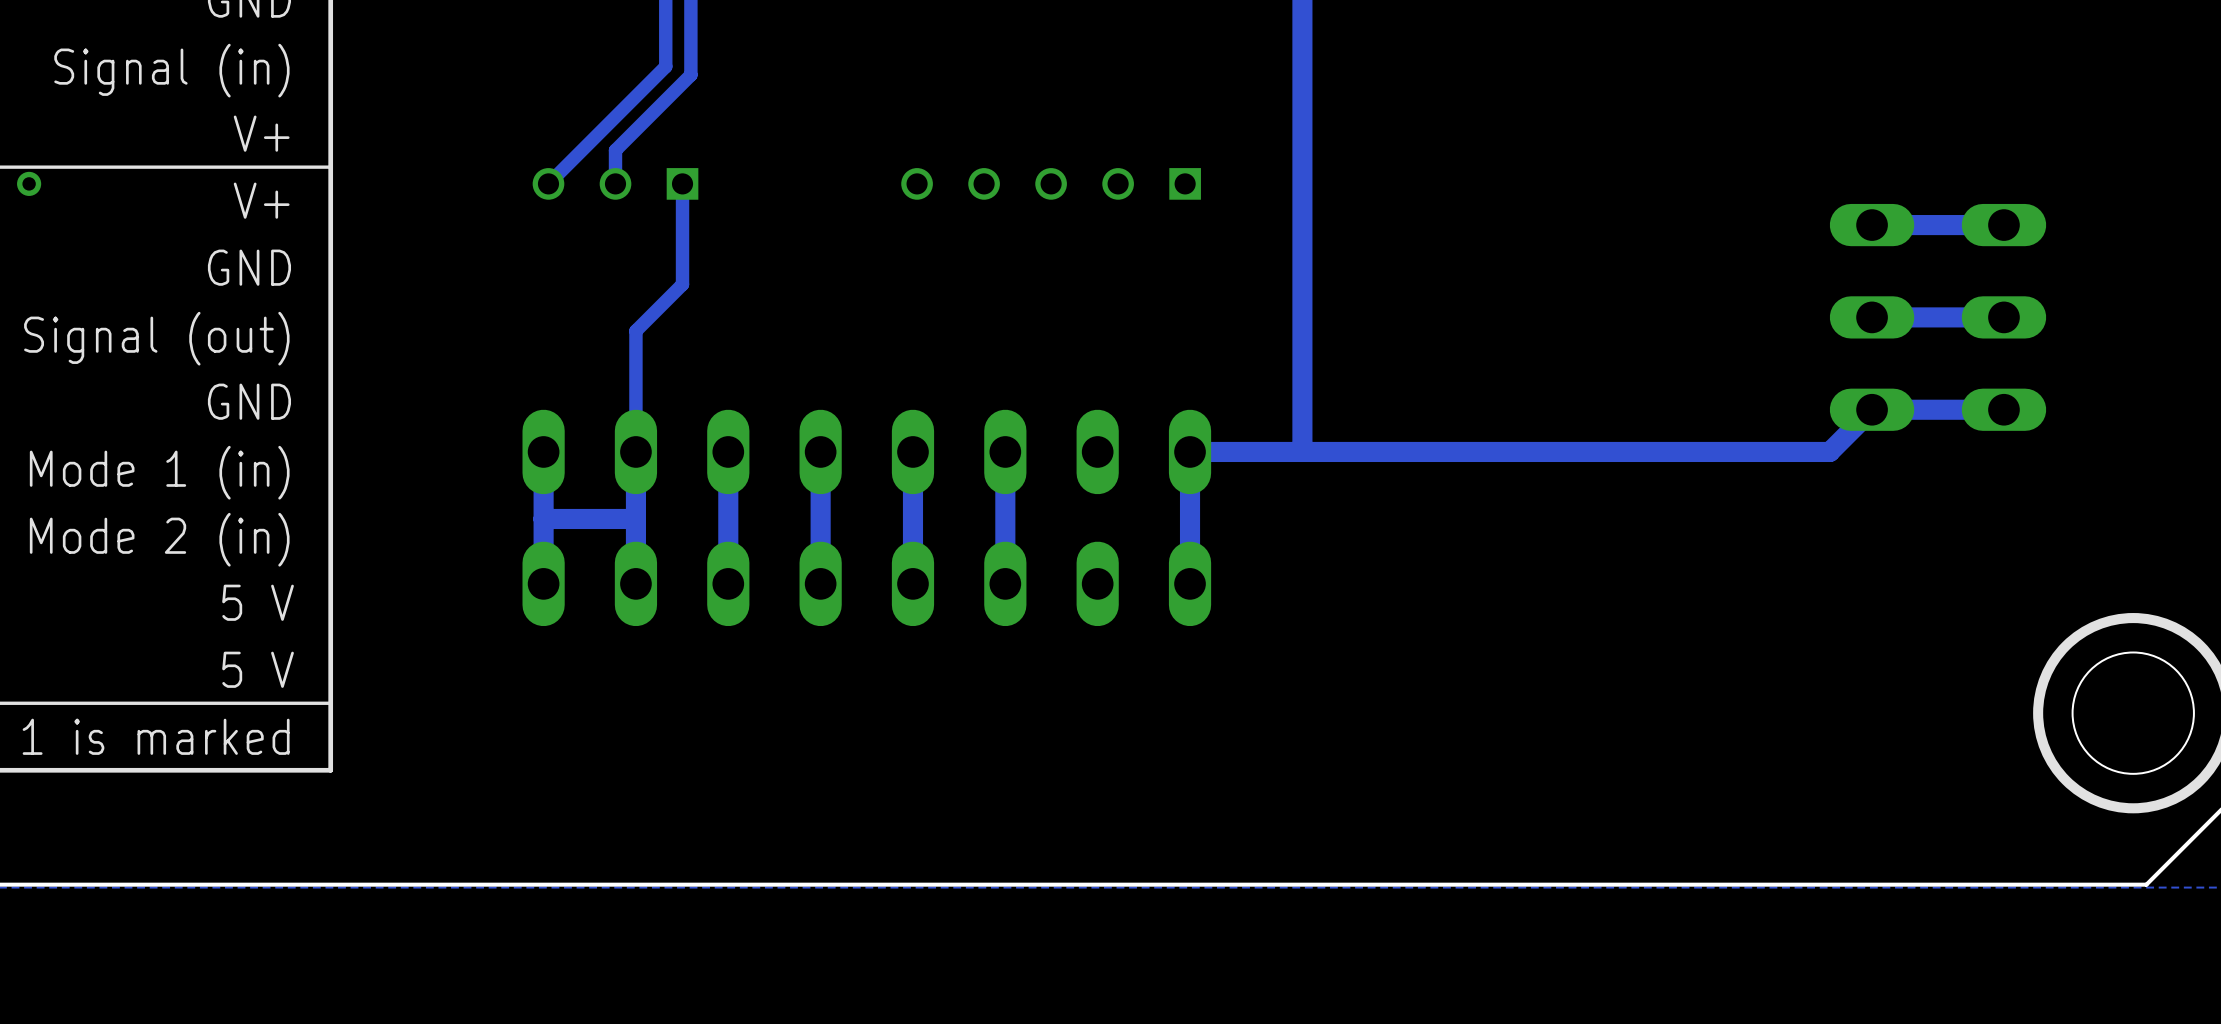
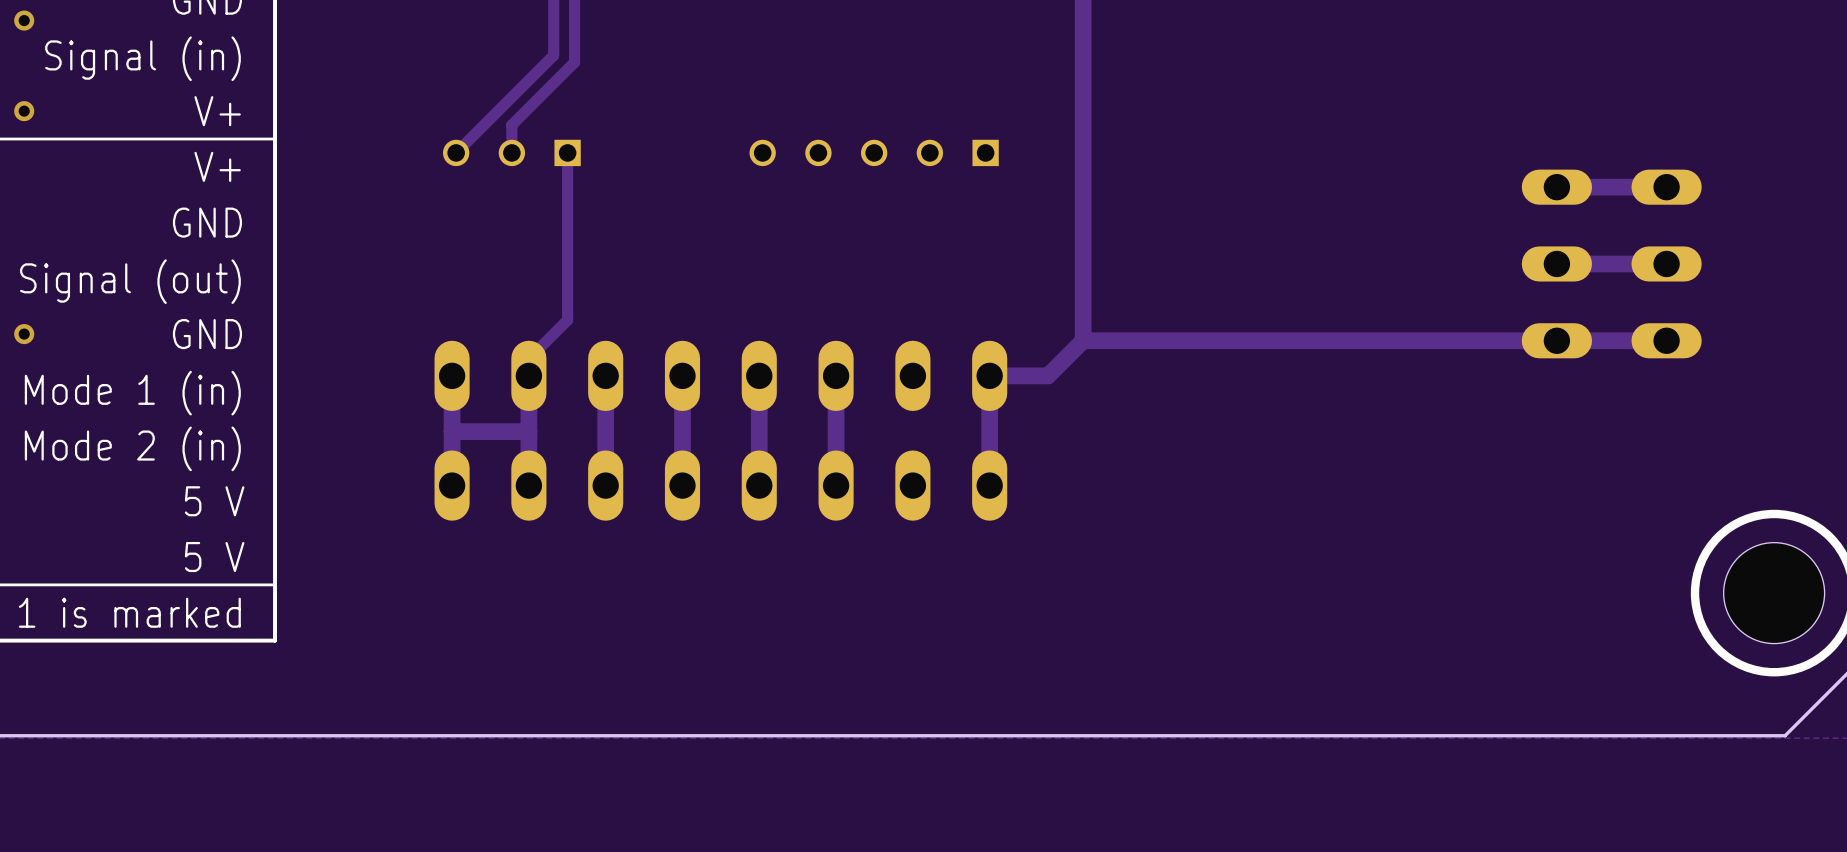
via: none -> (24, 20)
via position: (29, 183) -> (24, 111)
track: (682, 284) (635, 330) (635, 431) -> (567, 236) (567, 320) (528, 358)
via: none -> (24, 334)
track: (1302, 409) (1302, 451) -> none
track: (1872, 409) (1829, 451) (1260, 451) -> (1556, 340) (1083, 340) (1048, 375)

